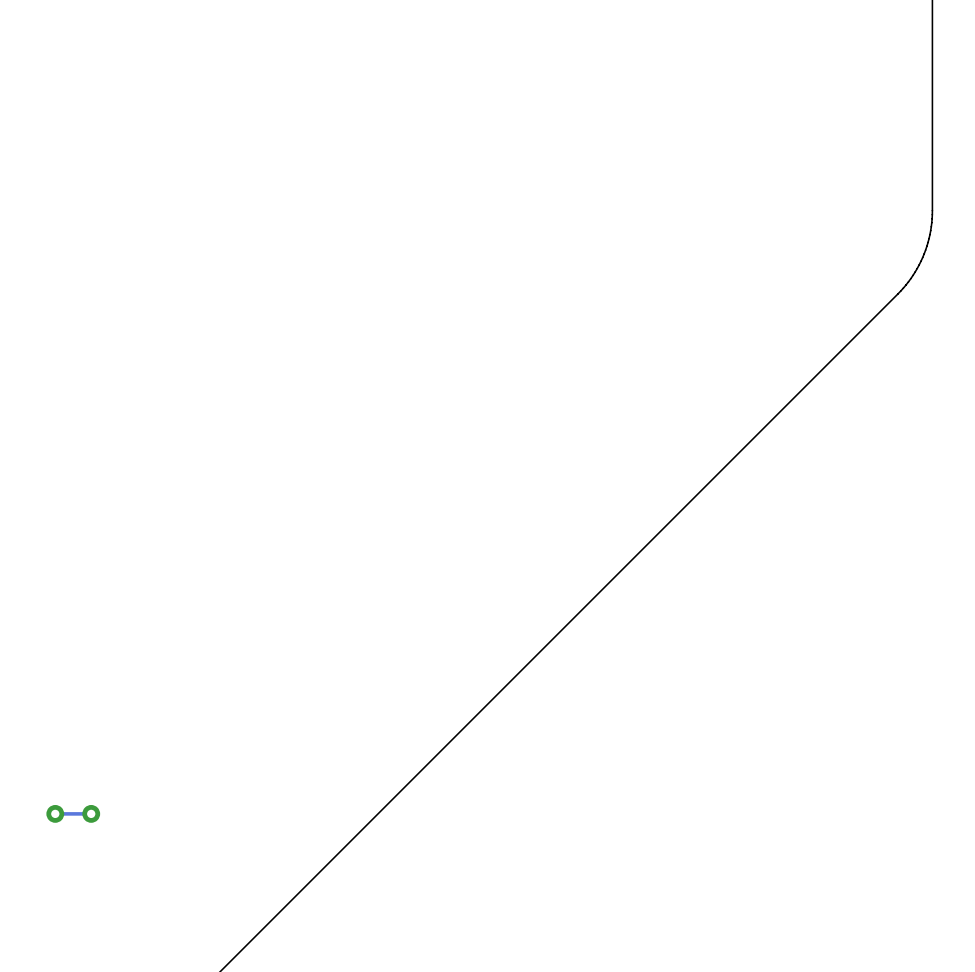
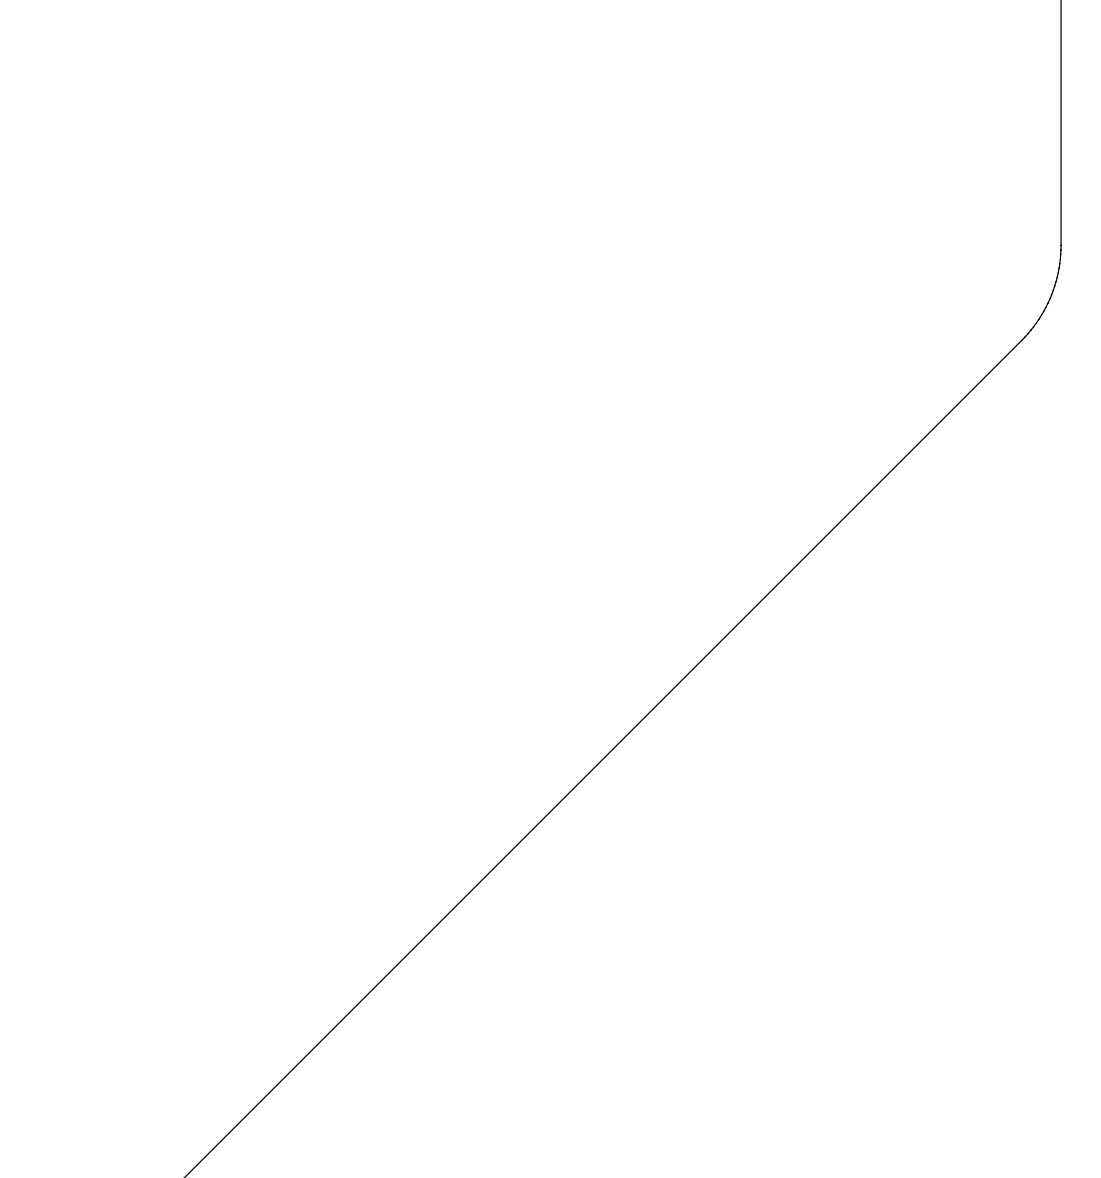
via: (55, 813) -> none
track: (91, 813) (55, 813) -> none
via: (91, 813) -> none

